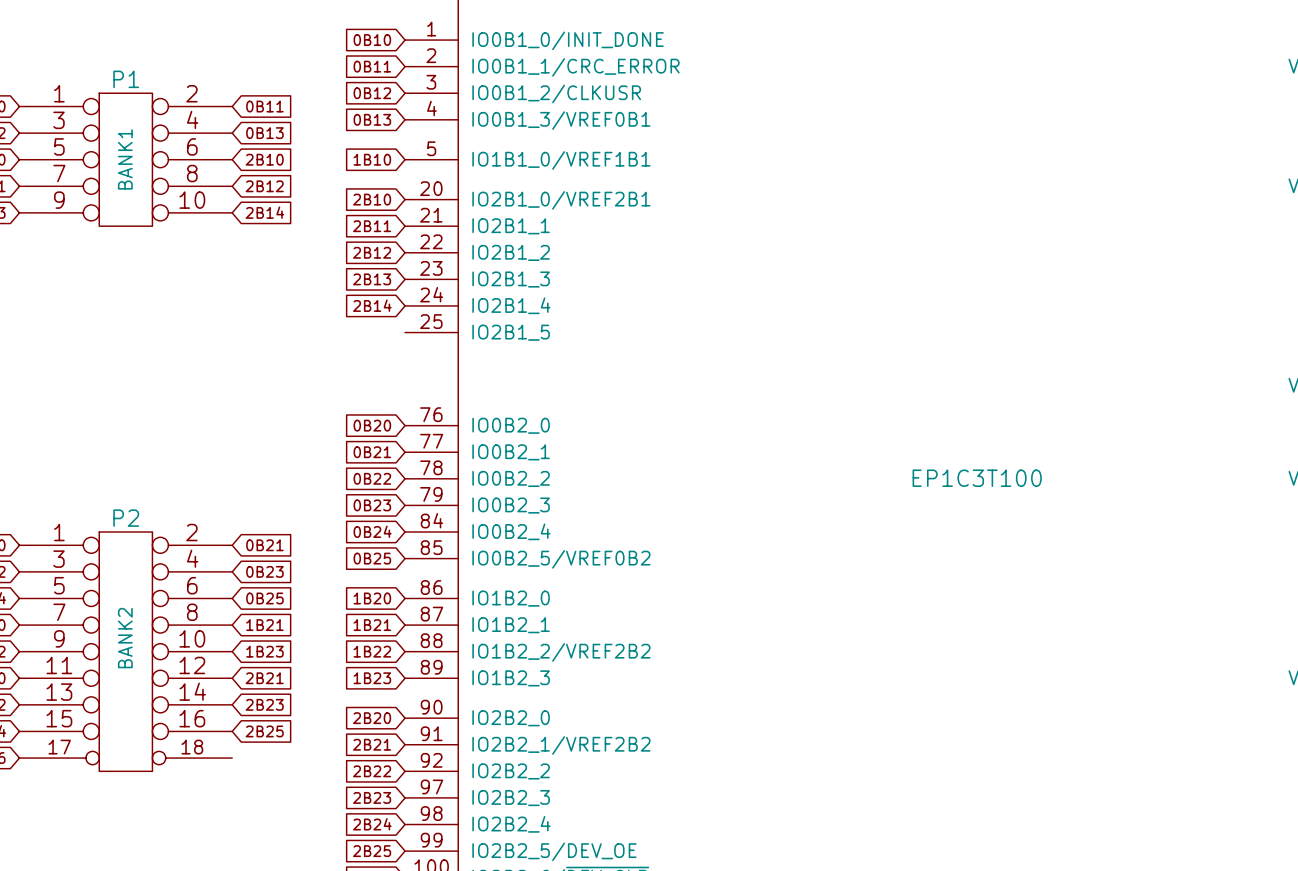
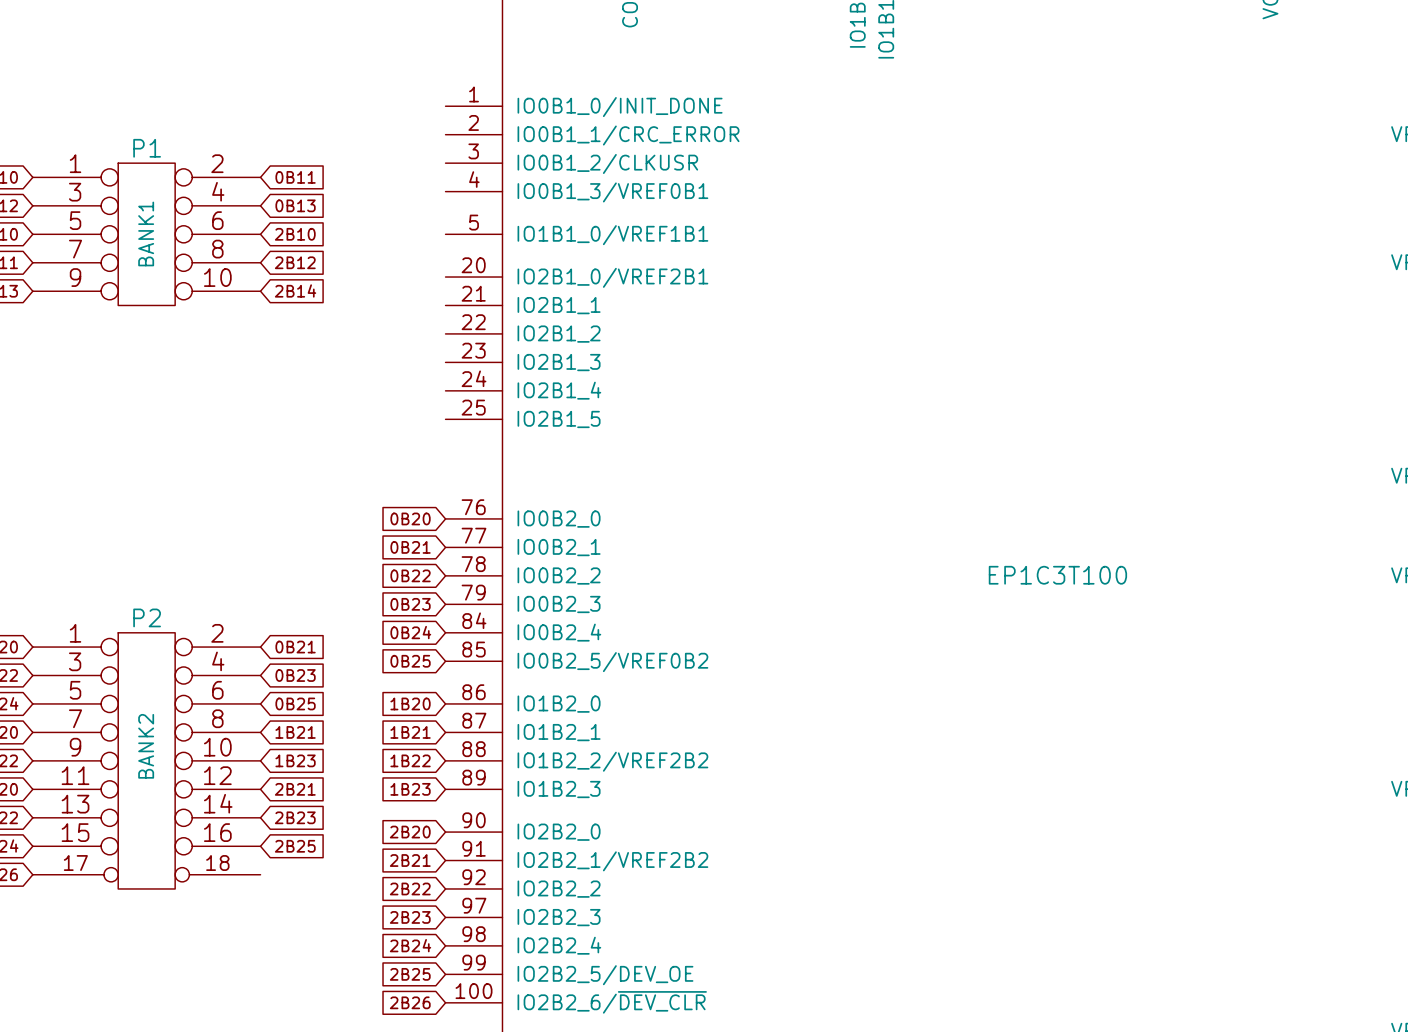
global label: 0B10 (372, 40) -> none
global label: 0B11 (372, 66) -> none
global label: 0B12 (372, 93) -> none
global label: 0B13 (372, 119) -> none
global label: 1B10 (372, 159) -> none
global label: 2B10 (372, 199) -> none
global label: 2B11 (372, 226) -> none
global label: 2B12 (372, 252) -> none
global label: 2B13 (372, 279) -> none
global label: 2B14 (372, 305) -> none

